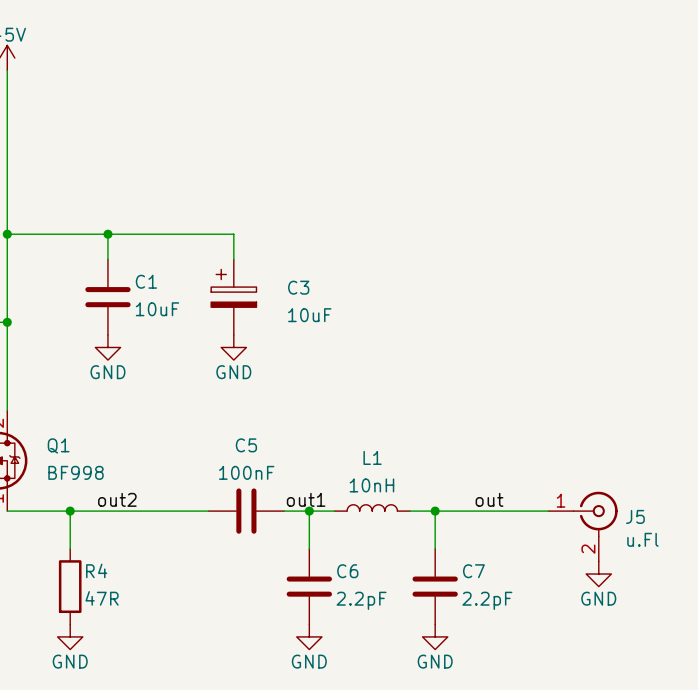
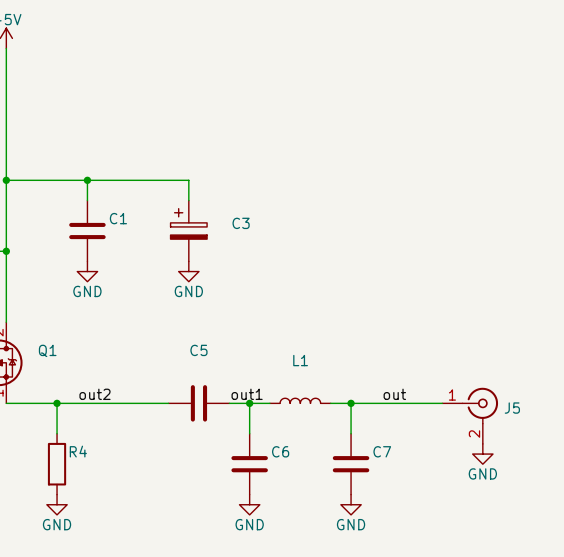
C1 value: 10uF (157, 309) -> none
C3 value: 10uF (309, 315) -> none
Q1 value: BF998 (76, 472) -> none
C5 value: 100nF (246, 472) -> none
L1 value: 10nH (371, 485) -> none
J5 value: u.Fl (642, 539) -> none
R4 value: 47R (102, 598) -> none
C6 value: 2.2pF (361, 600) -> none
C7 value: 2.2pF (487, 600) -> none

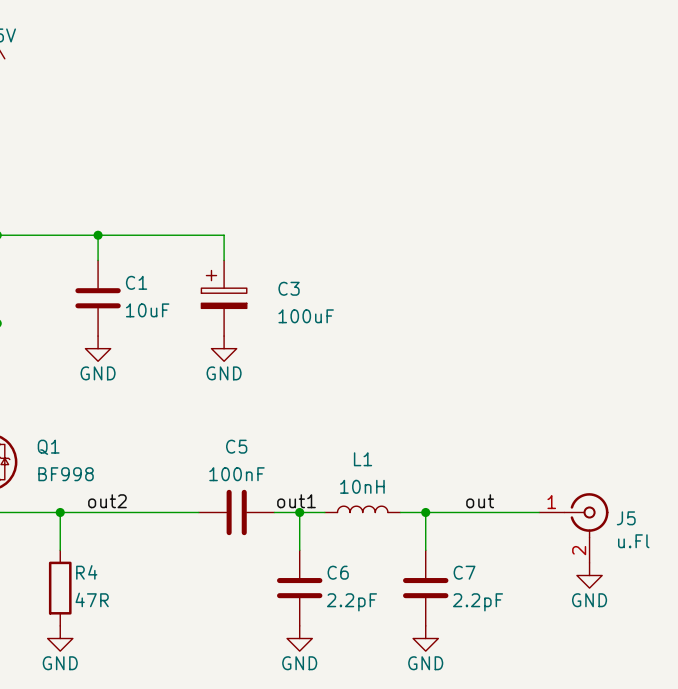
C1 value: none -> 10uF (147, 310)
C3 value: none -> 100uF (306, 316)
Q1 value: none -> BF998 (66, 474)
C5 value: none -> 100nF (236, 474)
L1 value: none -> 10nH (362, 486)
J5 value: none -> u.Fl (633, 541)
R4 value: none -> 47R (92, 599)
C6 value: none -> 2.2pF (352, 602)
C7 value: none -> 2.2pF (478, 602)

